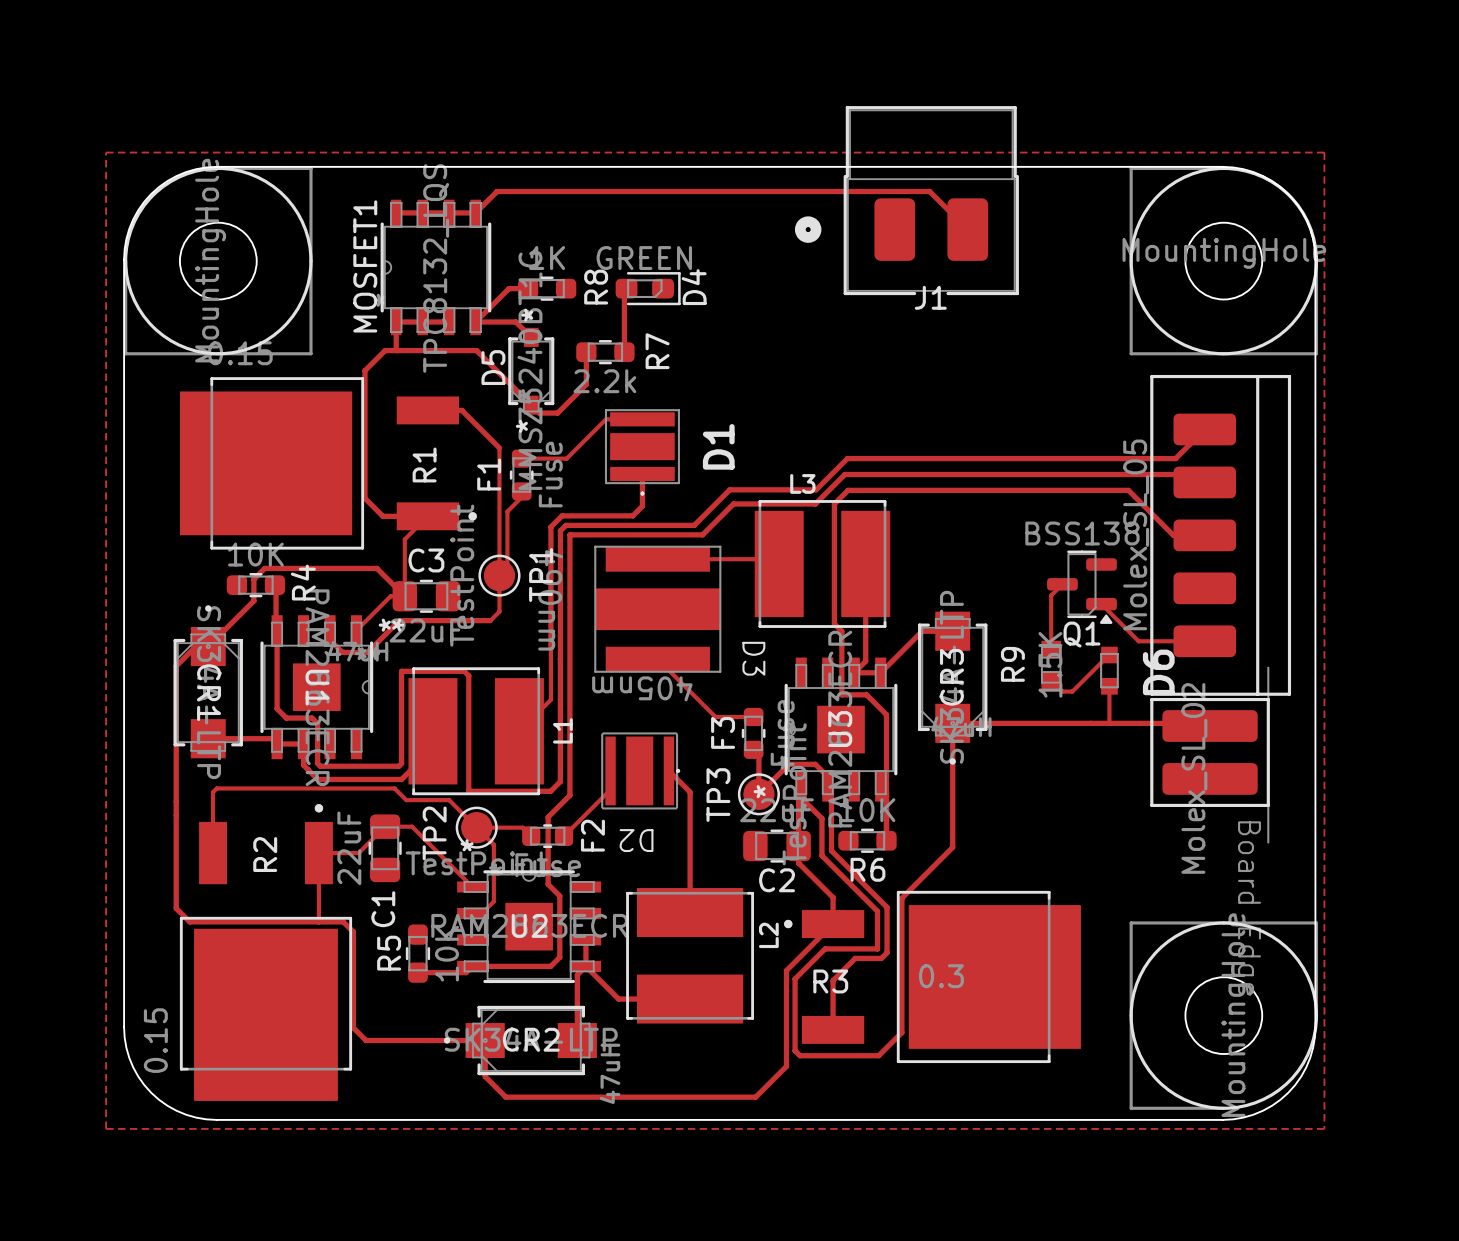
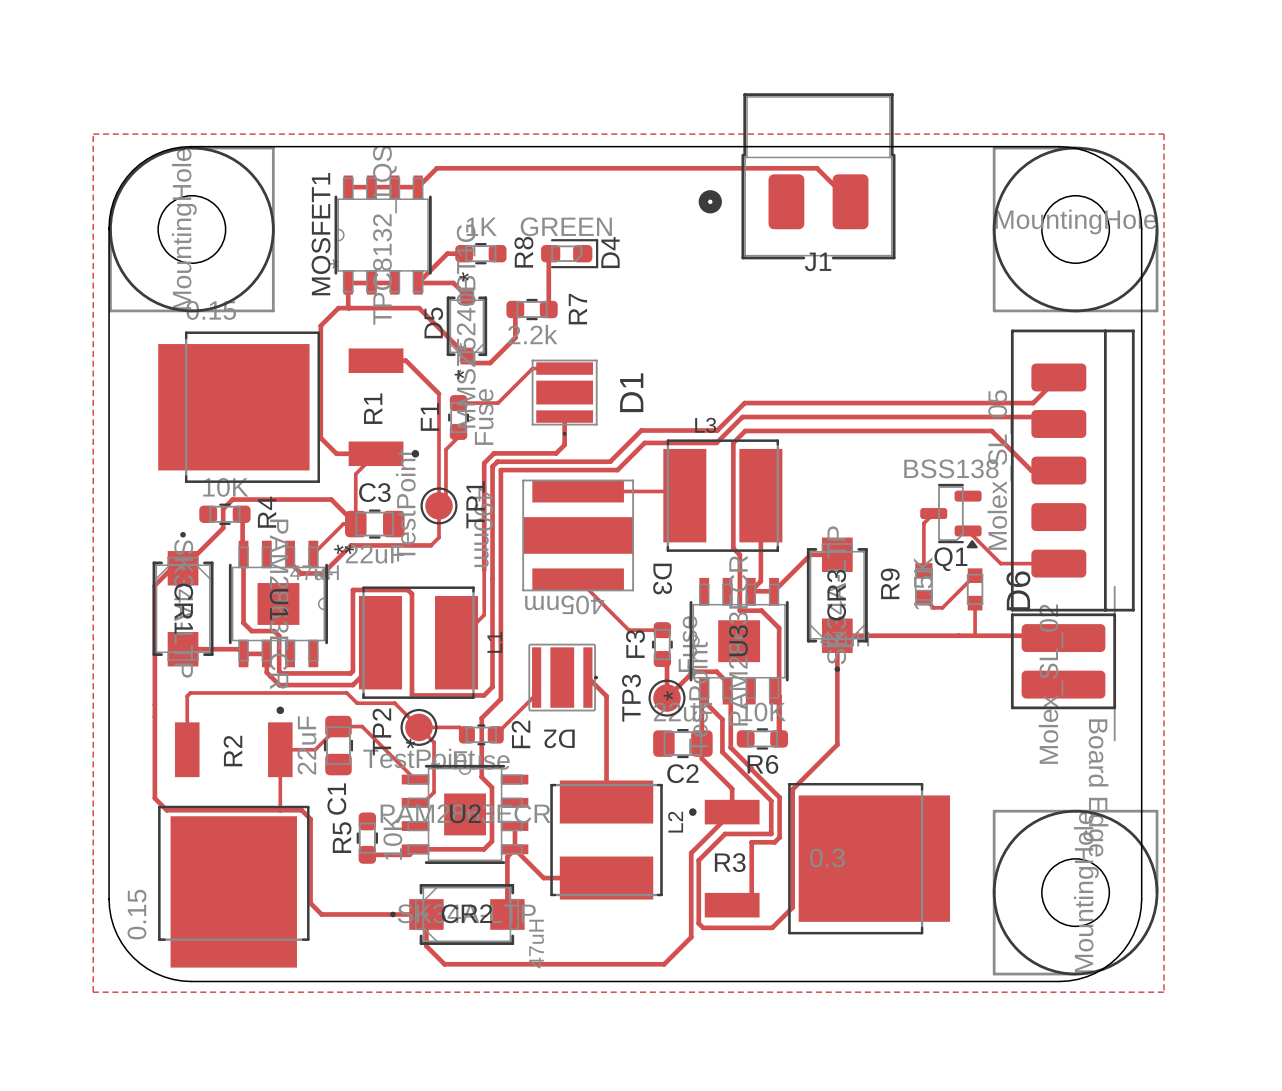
board edge: (1205, 166) (1243, 169) (1262, 176) (1280, 187) (1301, 210) (1310, 228) (1314, 249) (1315, 1027) (1313, 1047) (1306, 1067) (1295, 1085) (1280, 1099) (1253, 1114) (1222, 1119) (206, 1119) (186, 1114) (167, 1105) (144, 1085) (129, 1057) (124, 1037) (124, 1023) -> (1059, 146) (1086, 151) (1110, 164) (1129, 185) (1137, 201) (1141, 219) (1141, 899) (1139, 917) (1133, 934) (1123, 950) (1110, 963) (1086, 976) (1059, 981) (182, 980) (164, 976) (147, 968) (127, 950) (113, 926) (109, 899)
top track: (855, 958) (833, 980) (833, 1029) -> (751, 842) (751, 902) (754, 905) (732, 905)

